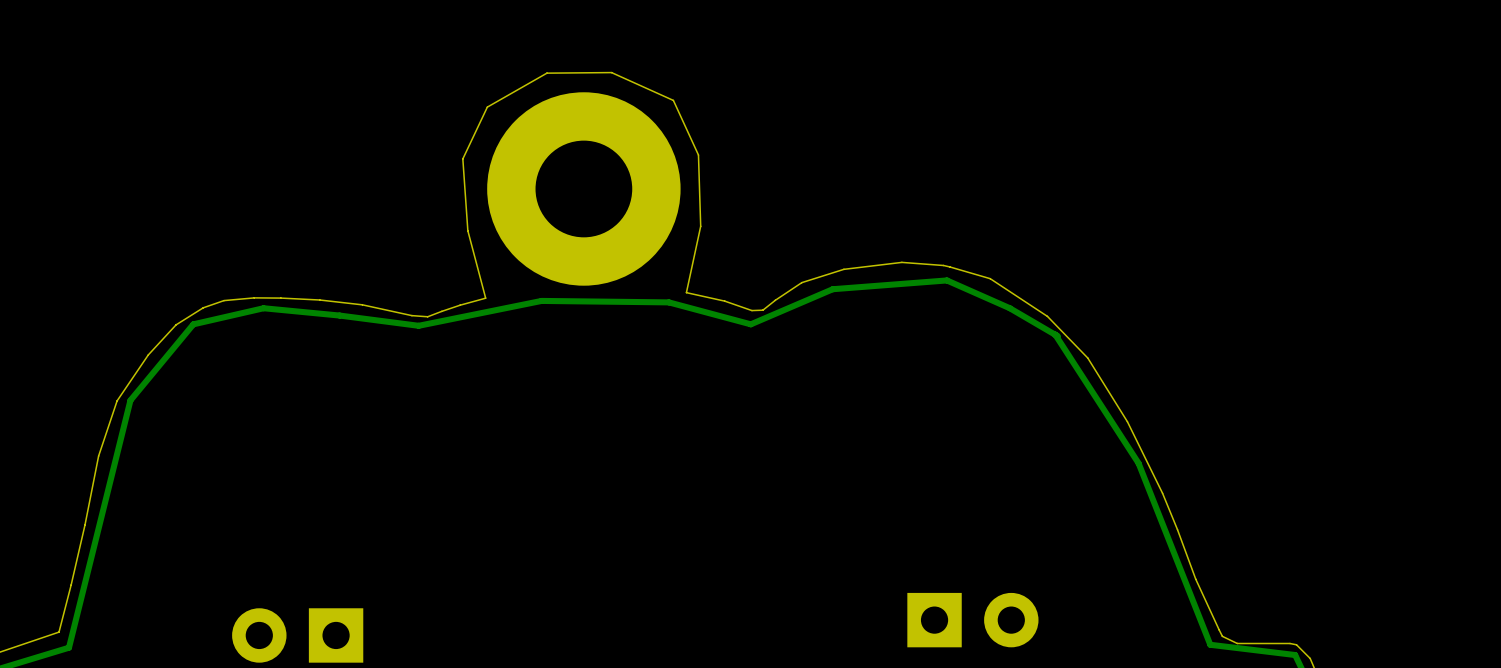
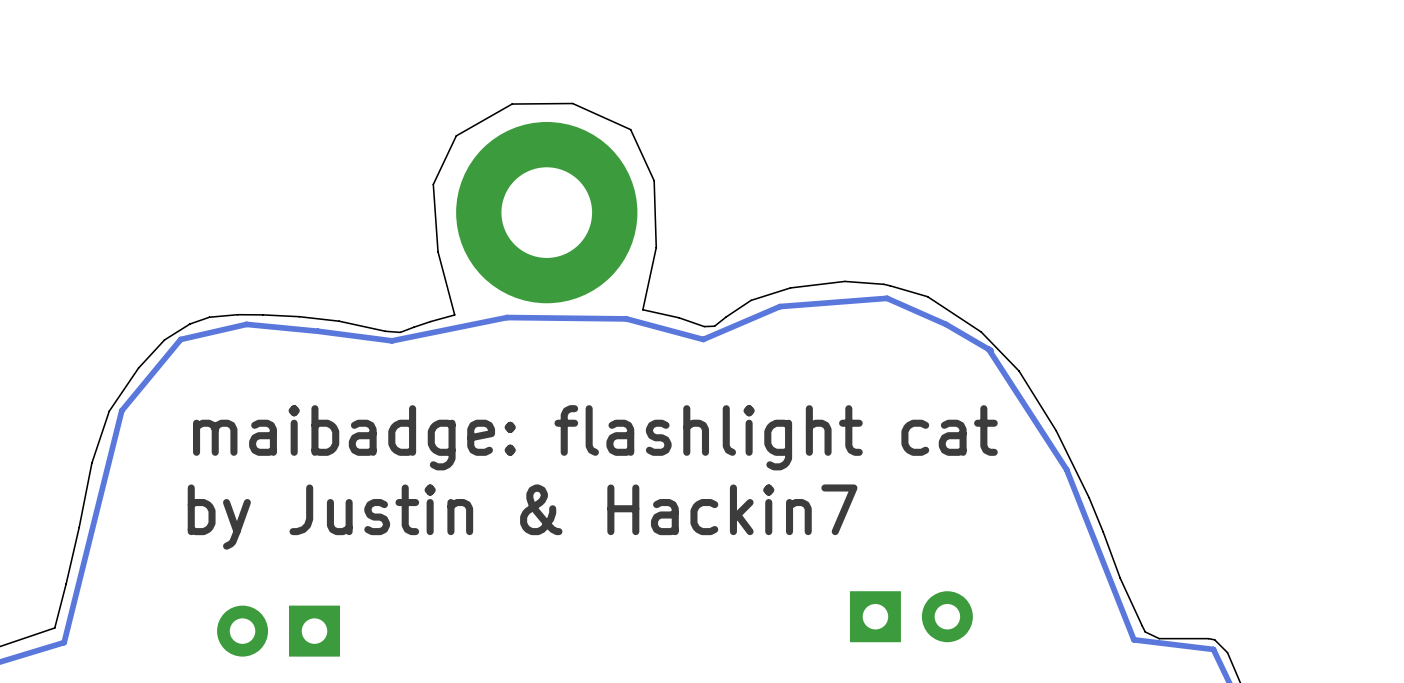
text: none -> maibadge: flashlight cat (595, 437)
text: none -> by Justin & Hackin7 (522, 517)

